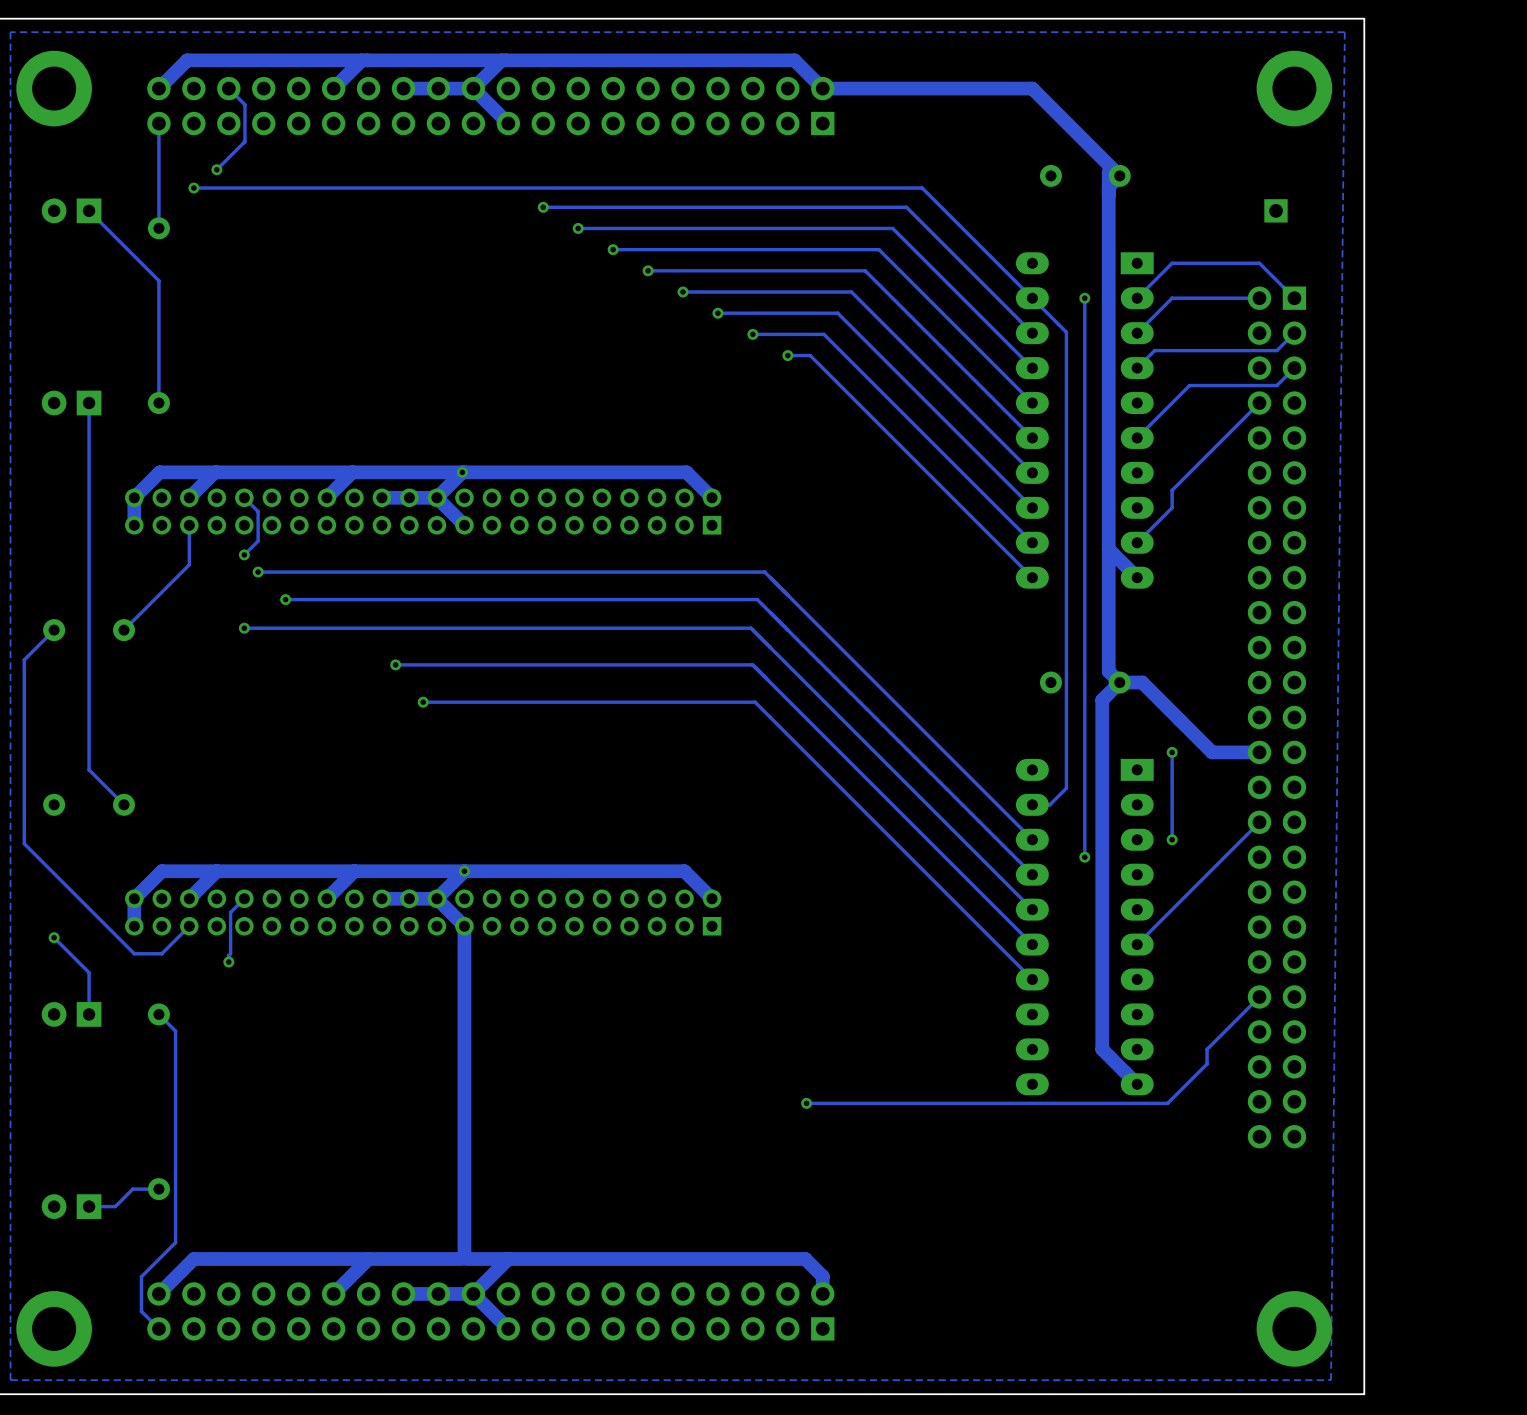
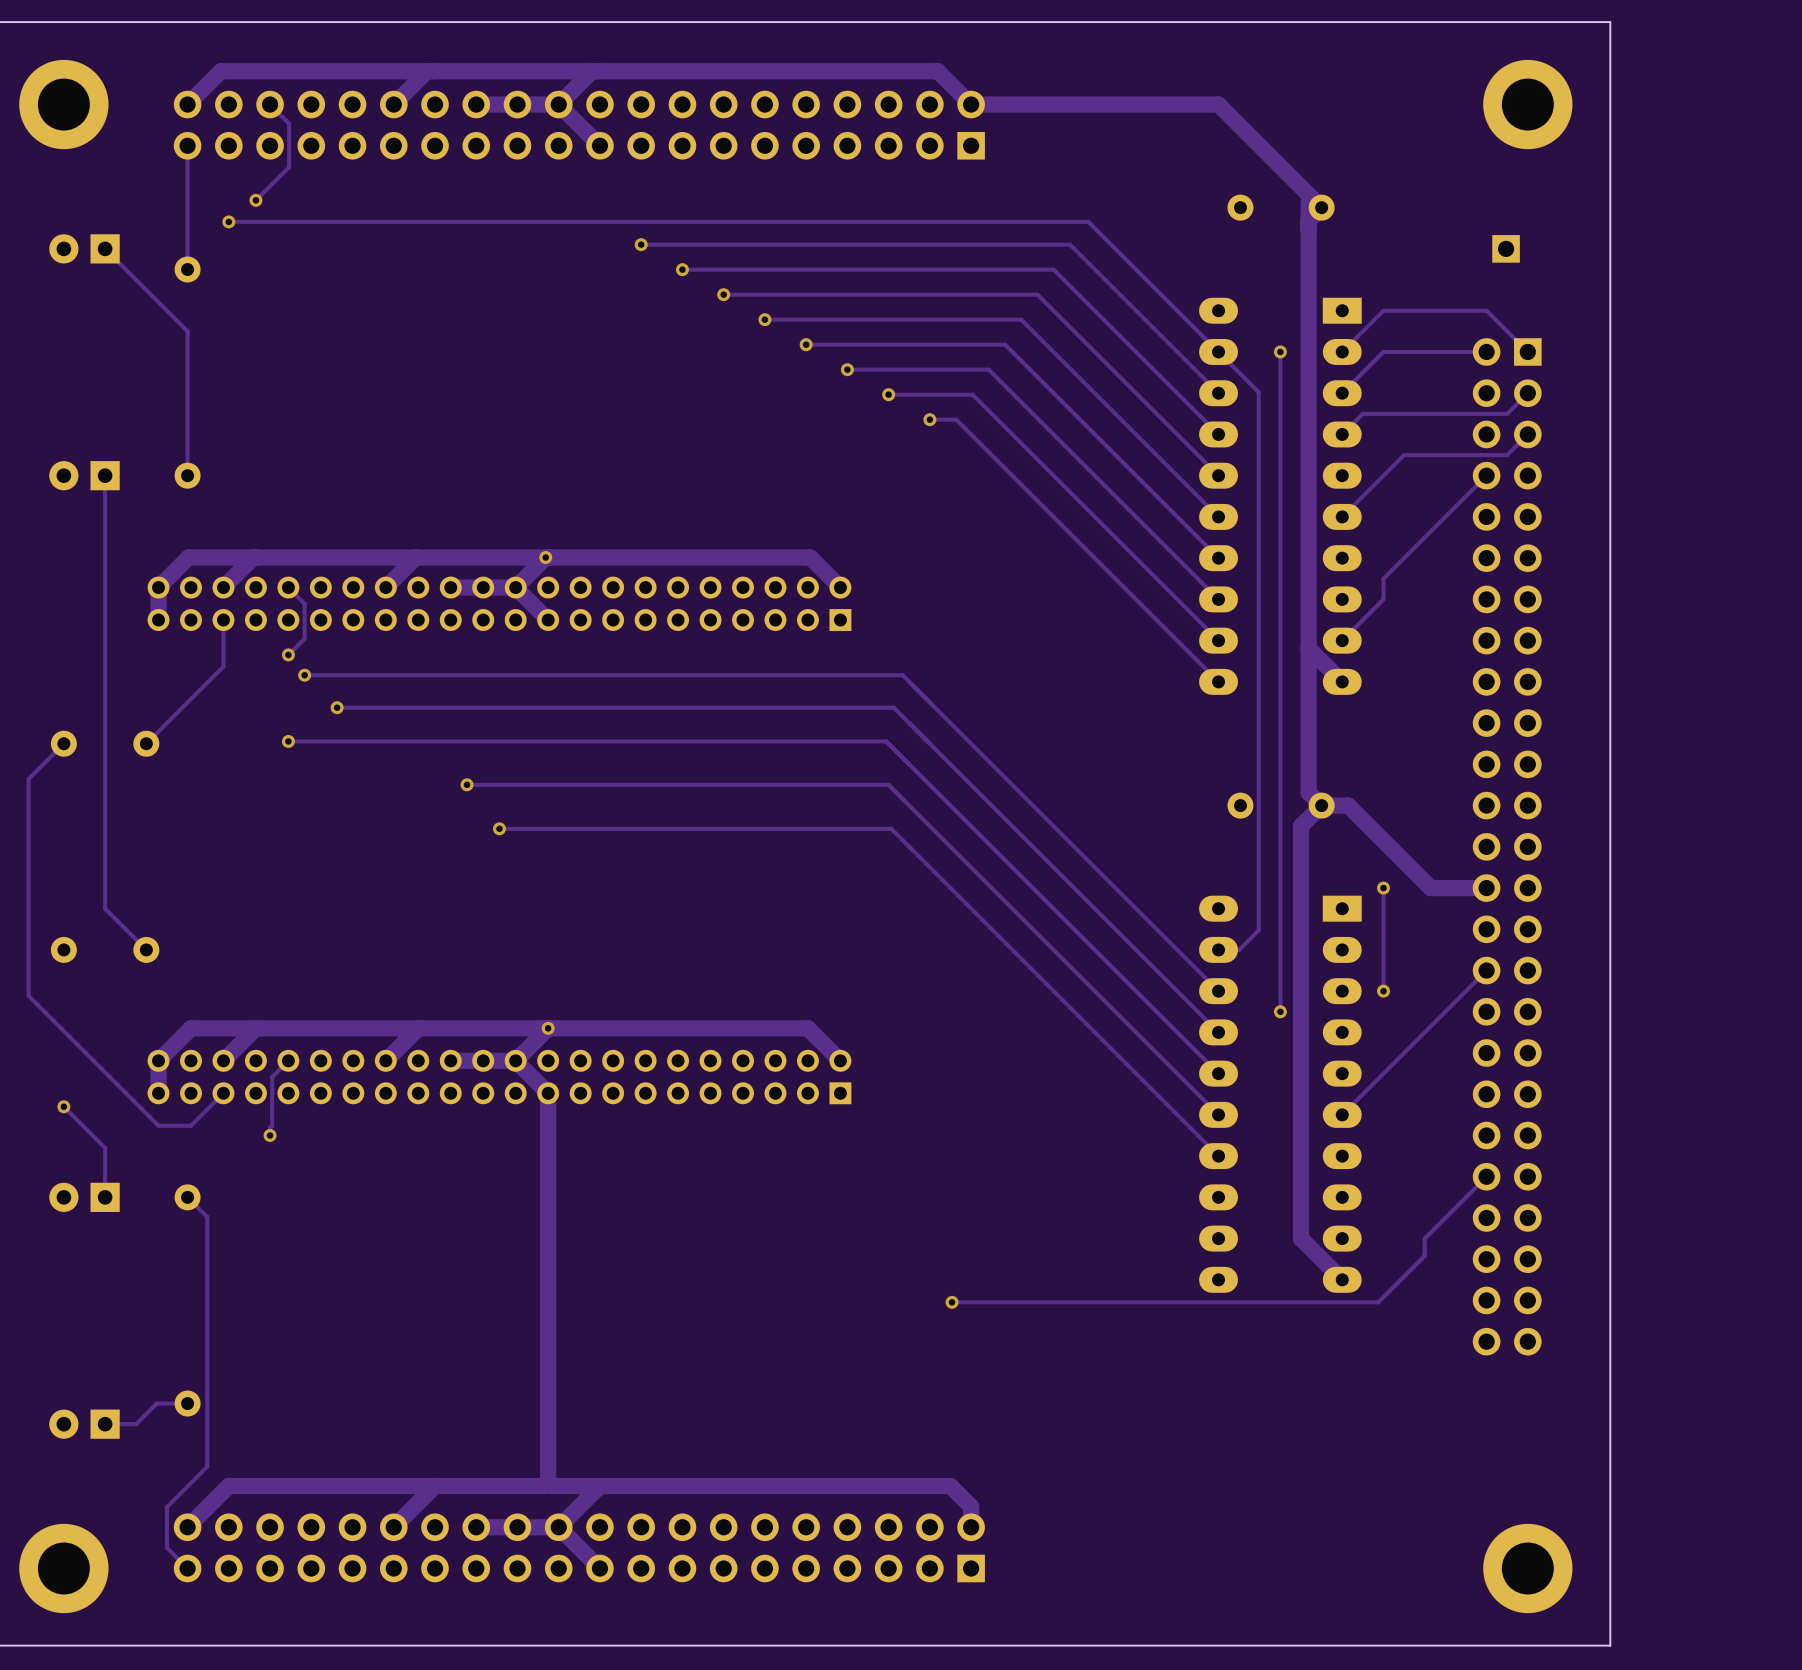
zone outline: (1344, 32) (1331, 1380) (10, 1380) (10, 32) (1344, 32) -> none

